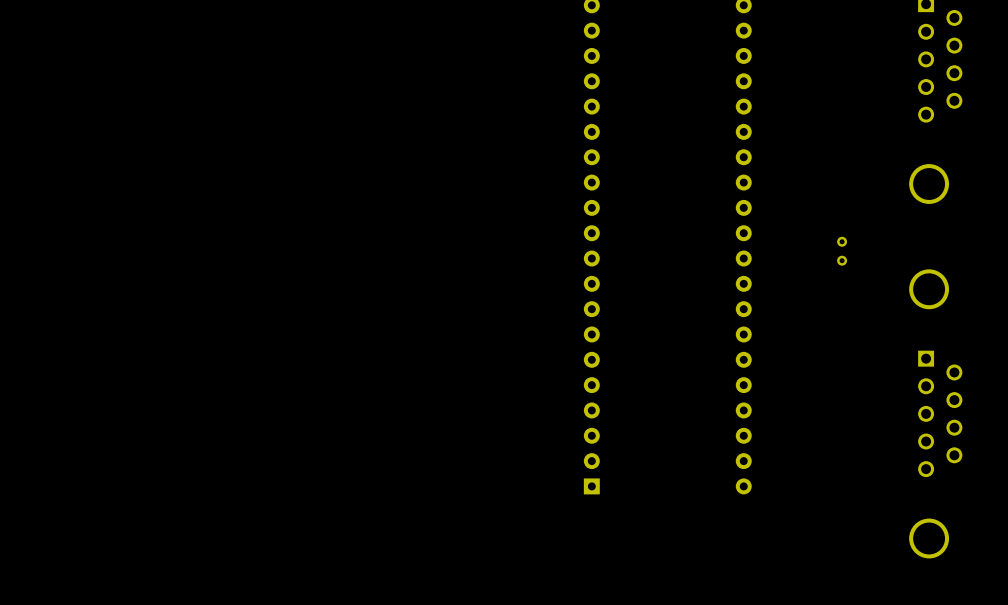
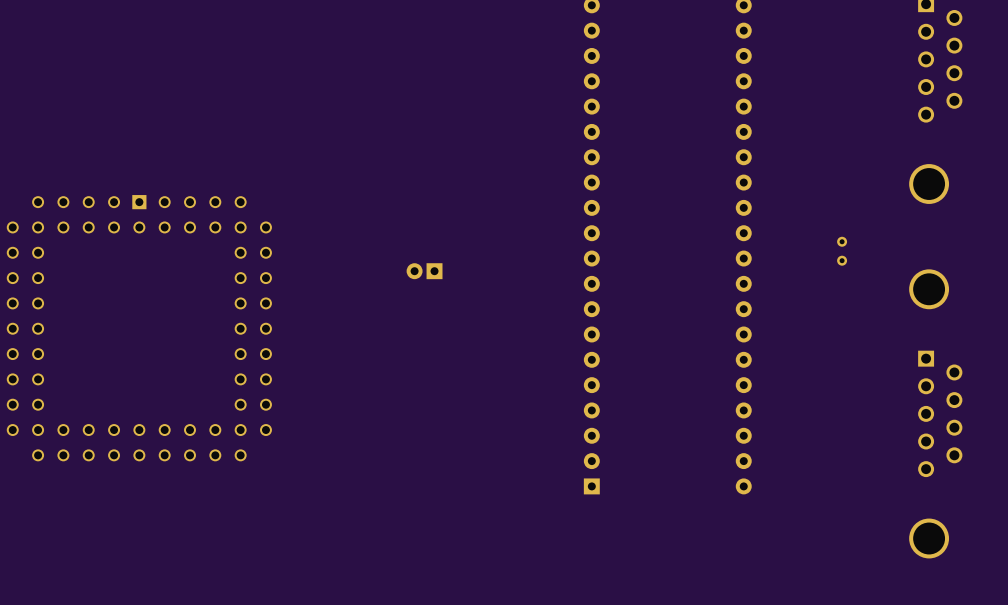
part: none -> (424, 271)
part: none -> (139, 328)

